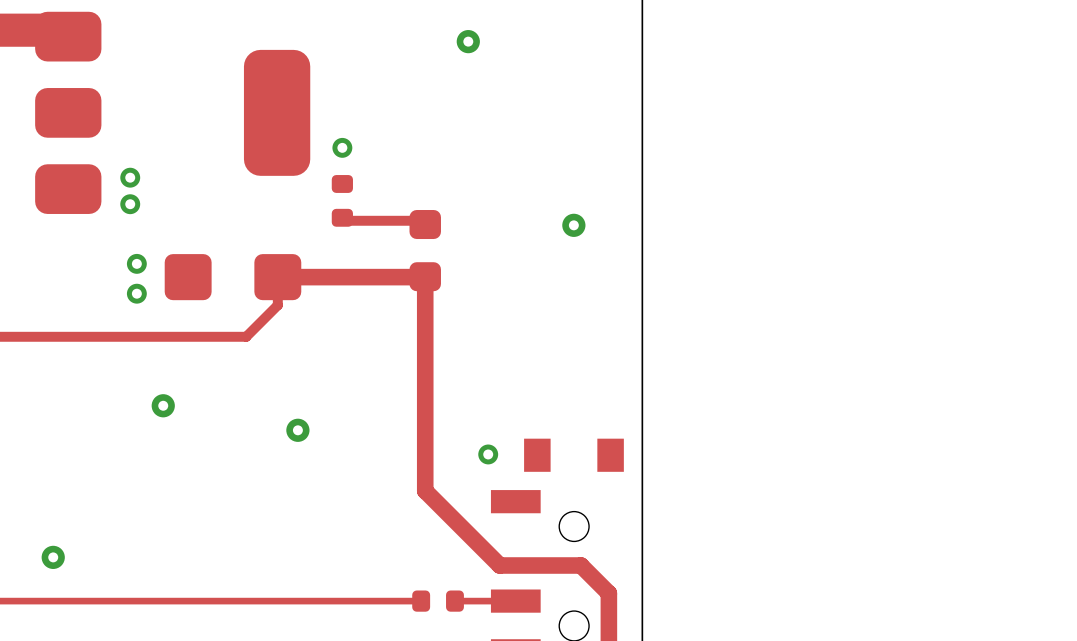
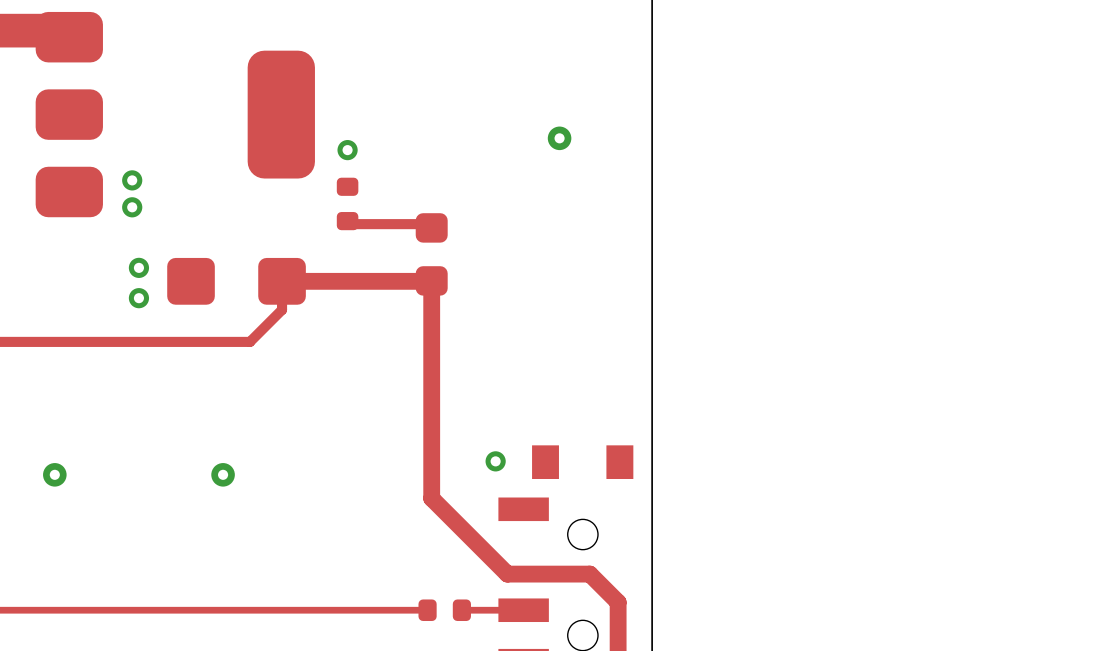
via: (468, 41) -> none
via: none -> (559, 138)
via: (573, 225) -> none
via: (163, 405) -> none
via: (297, 430) -> none
via: none -> (54, 474)
via: none -> (223, 474)
via: (53, 557) -> none

